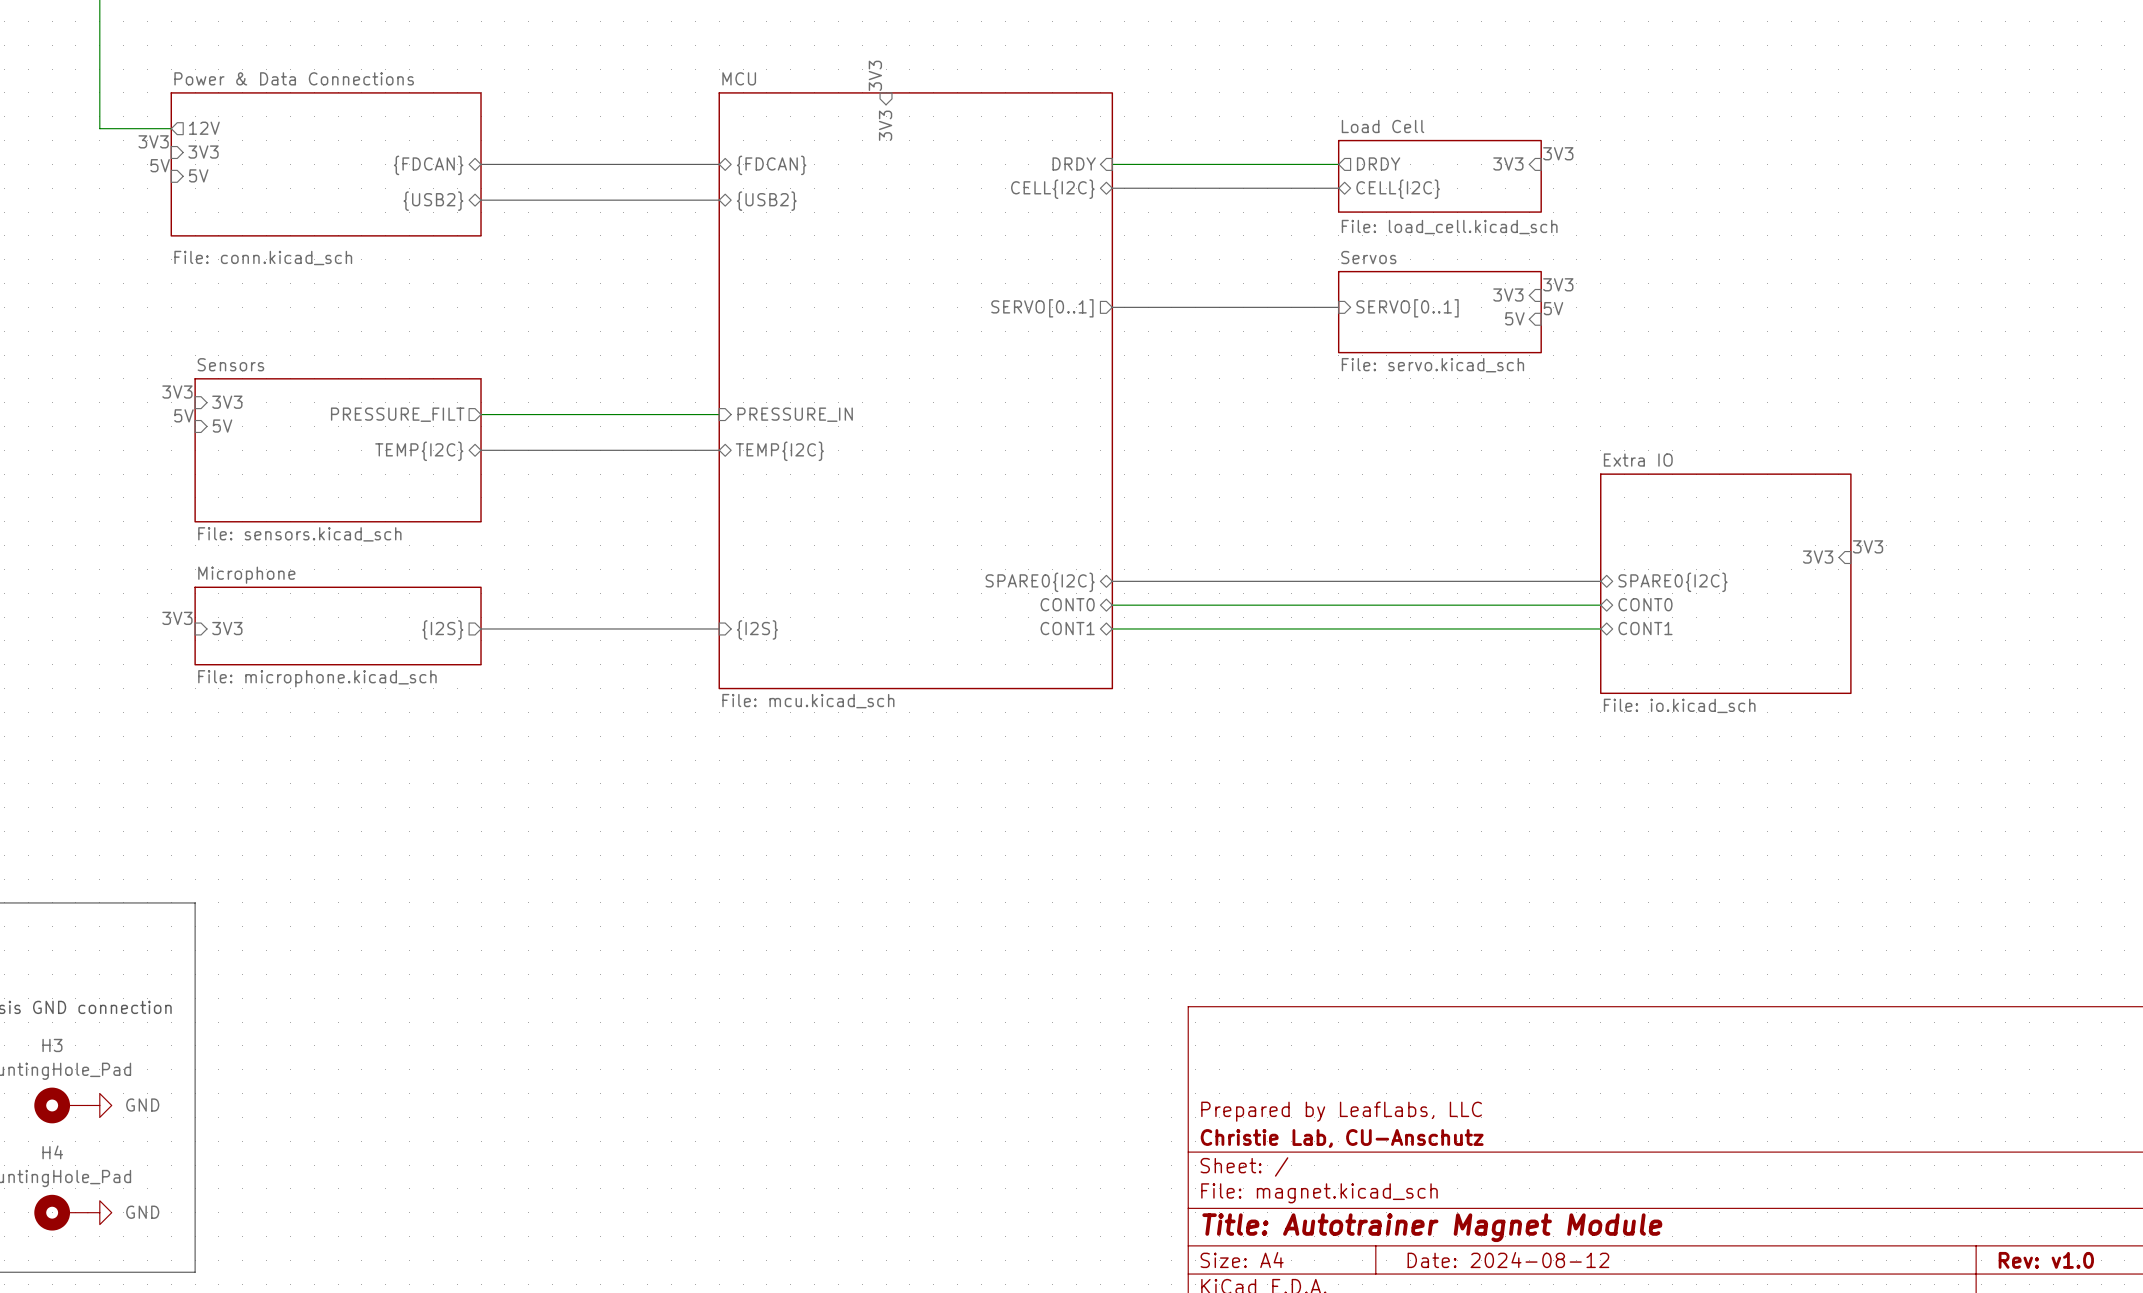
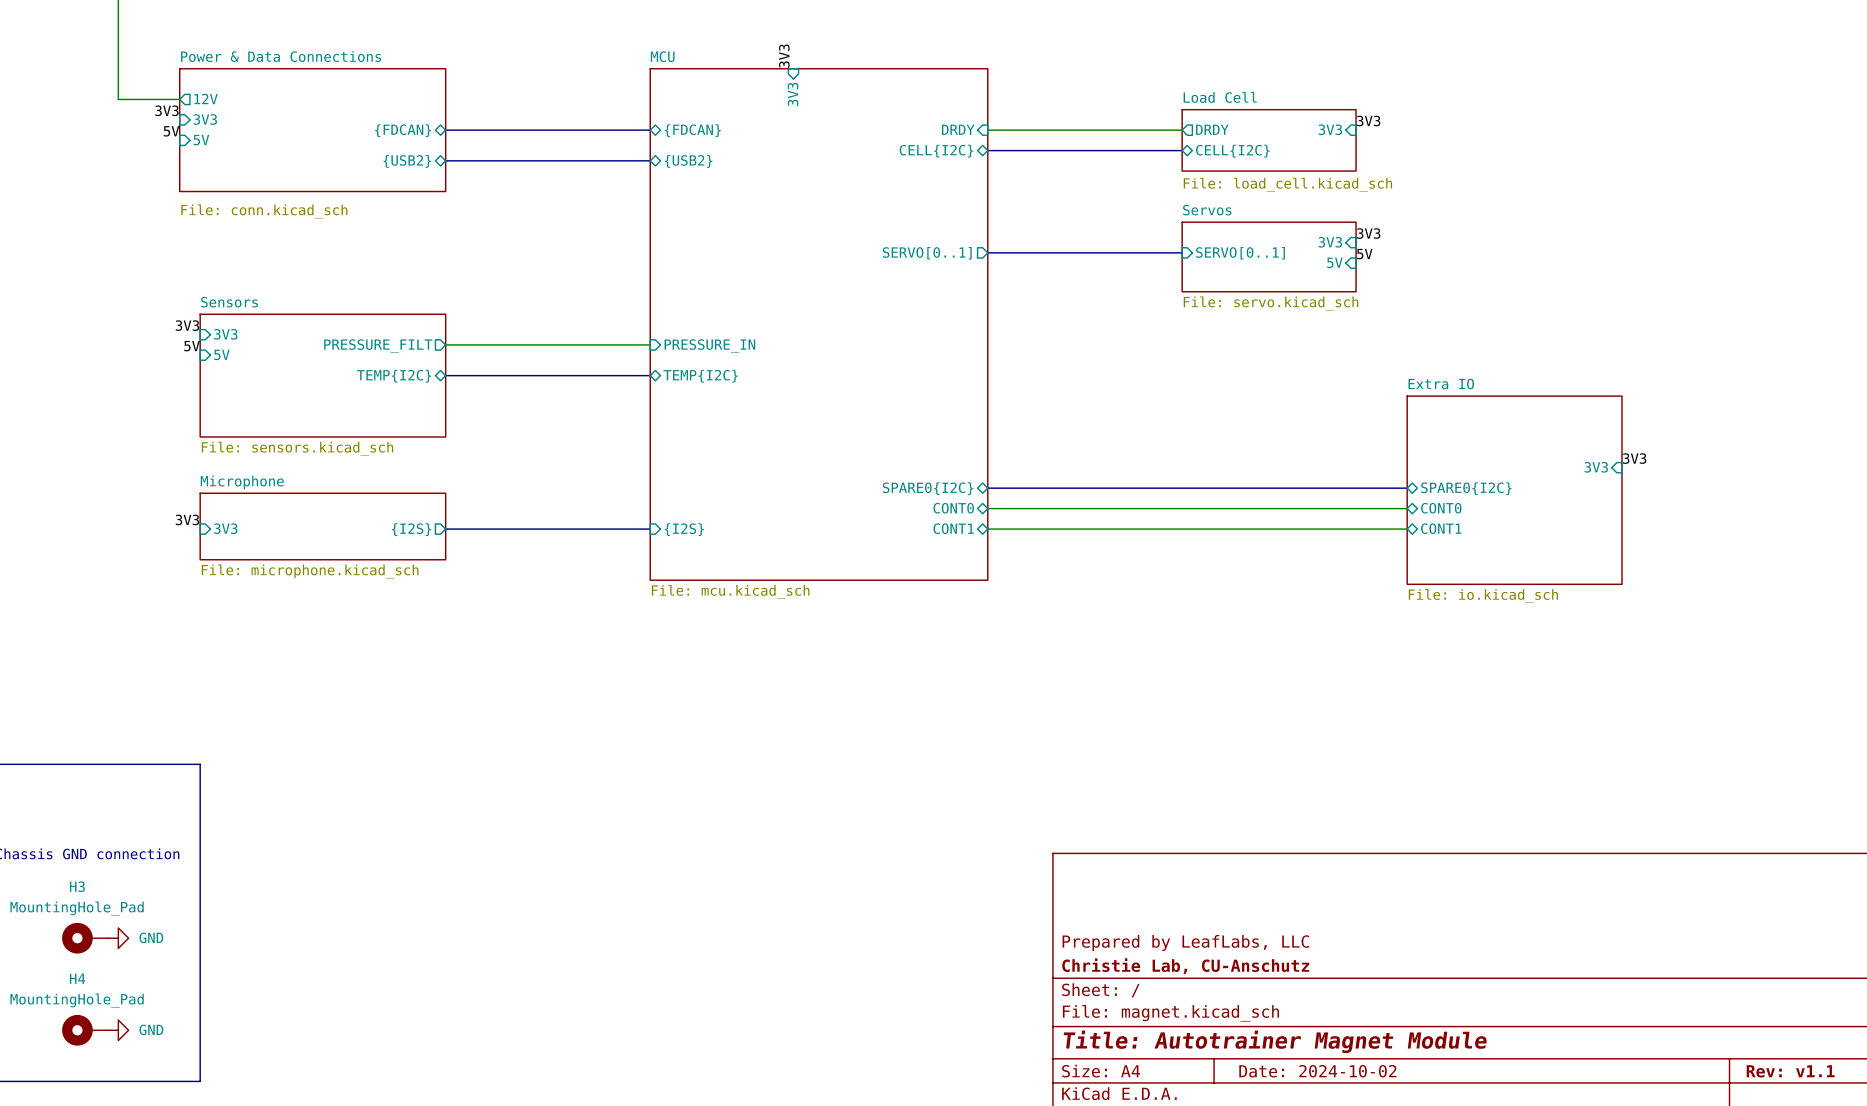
title block: Date: 2024-08-12 (1508, 1260) -> Date: 2024-10-02 (1317, 1071)
title block: Rev: v1.0 (2046, 1260) -> Rev: v1.1 (1790, 1071)

